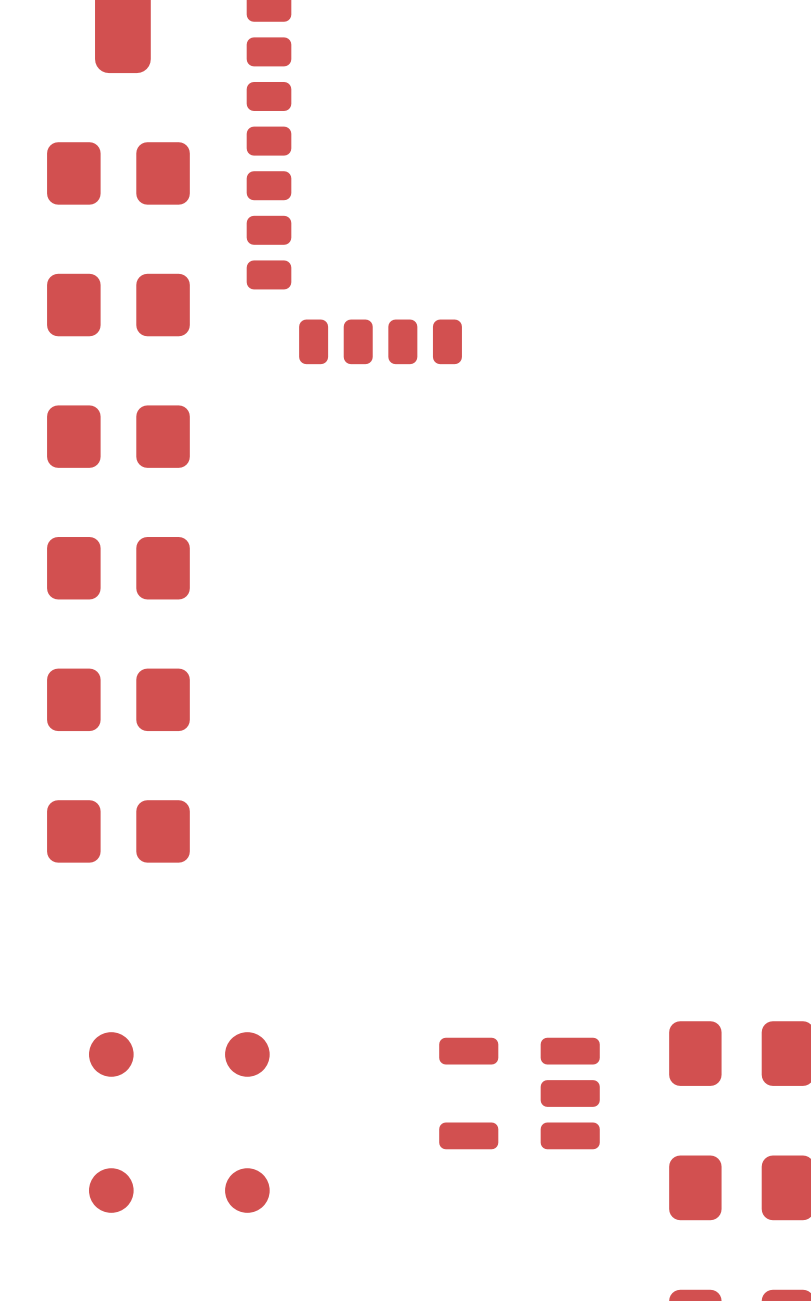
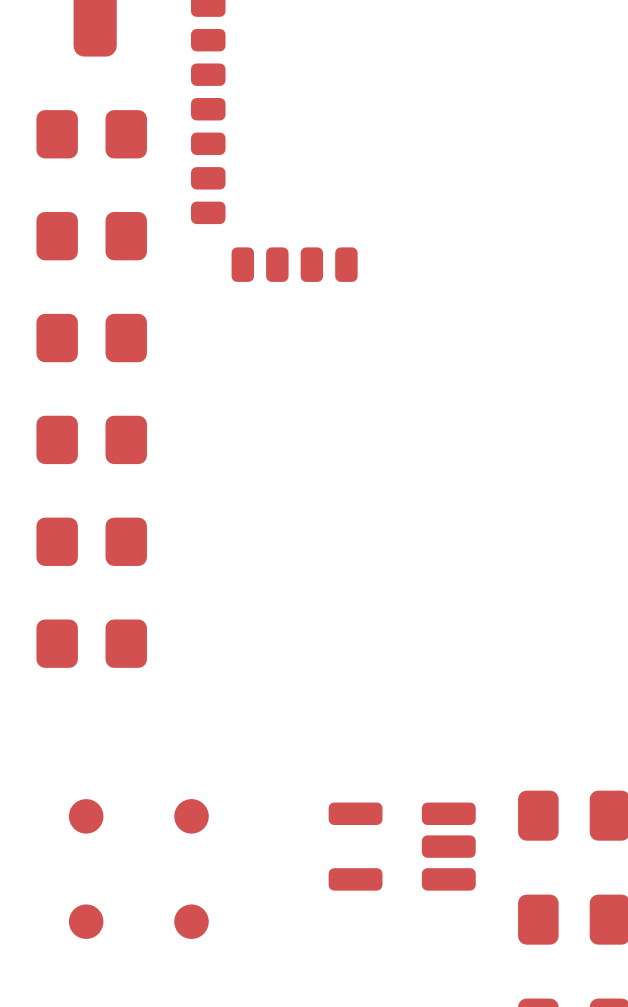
part footprint: [439, 1037, 600, 1150] -> [328, 802, 476, 891]

